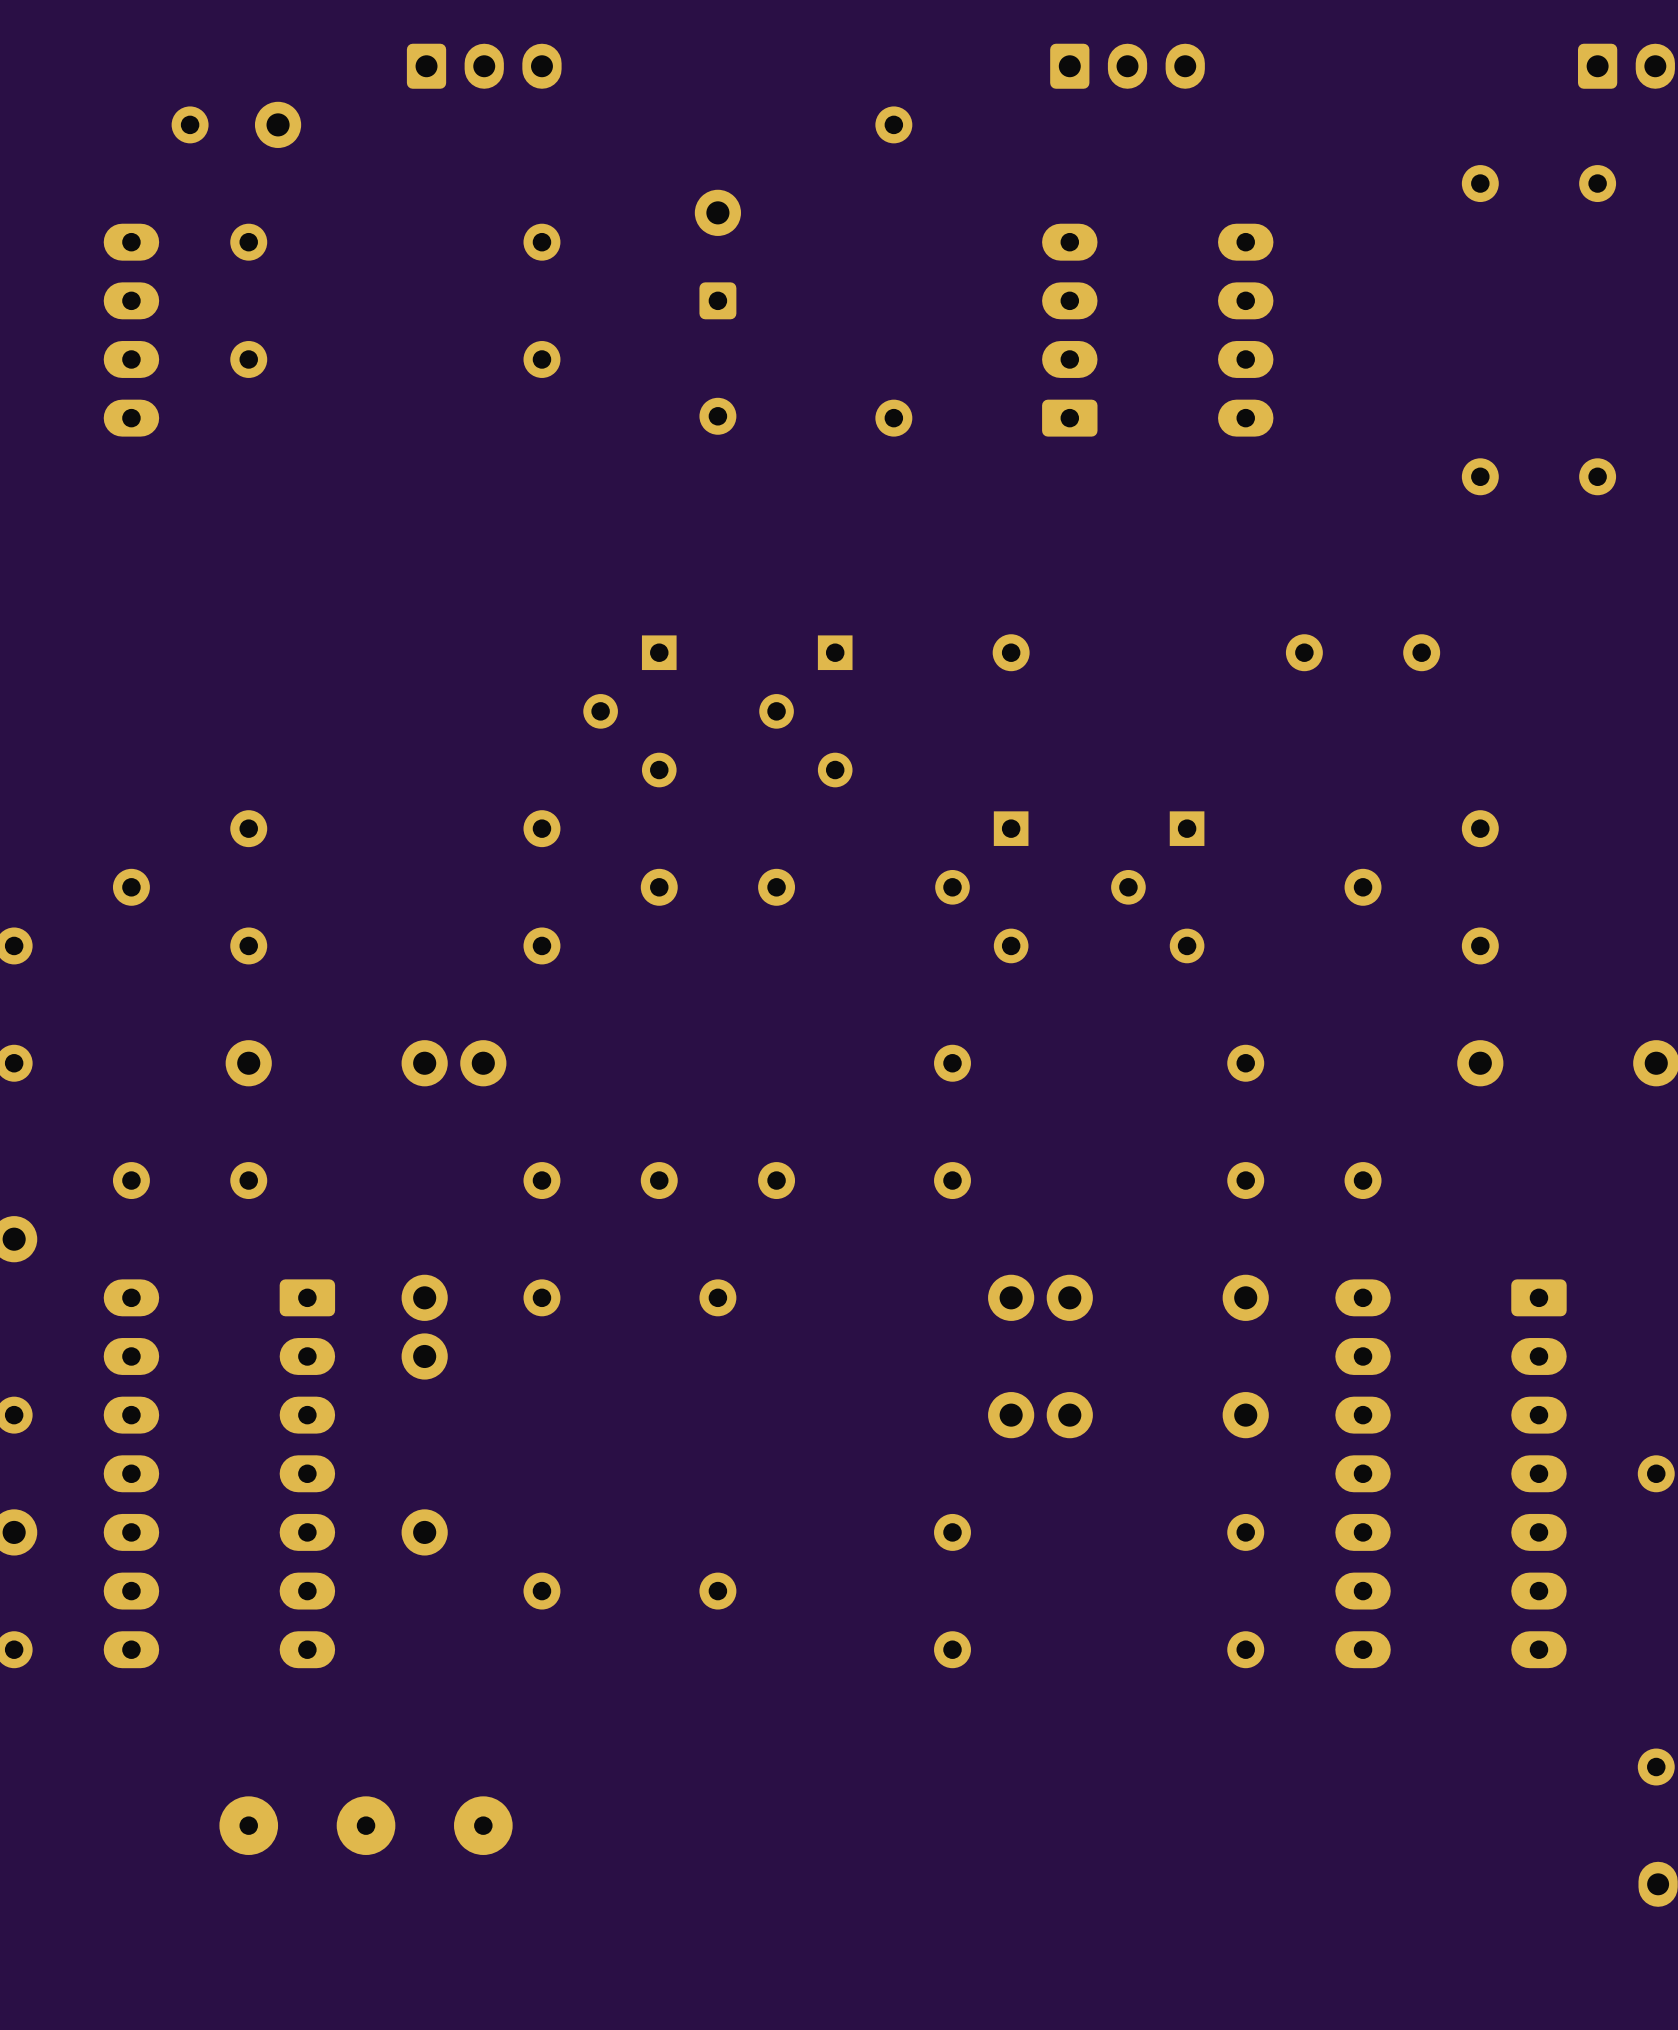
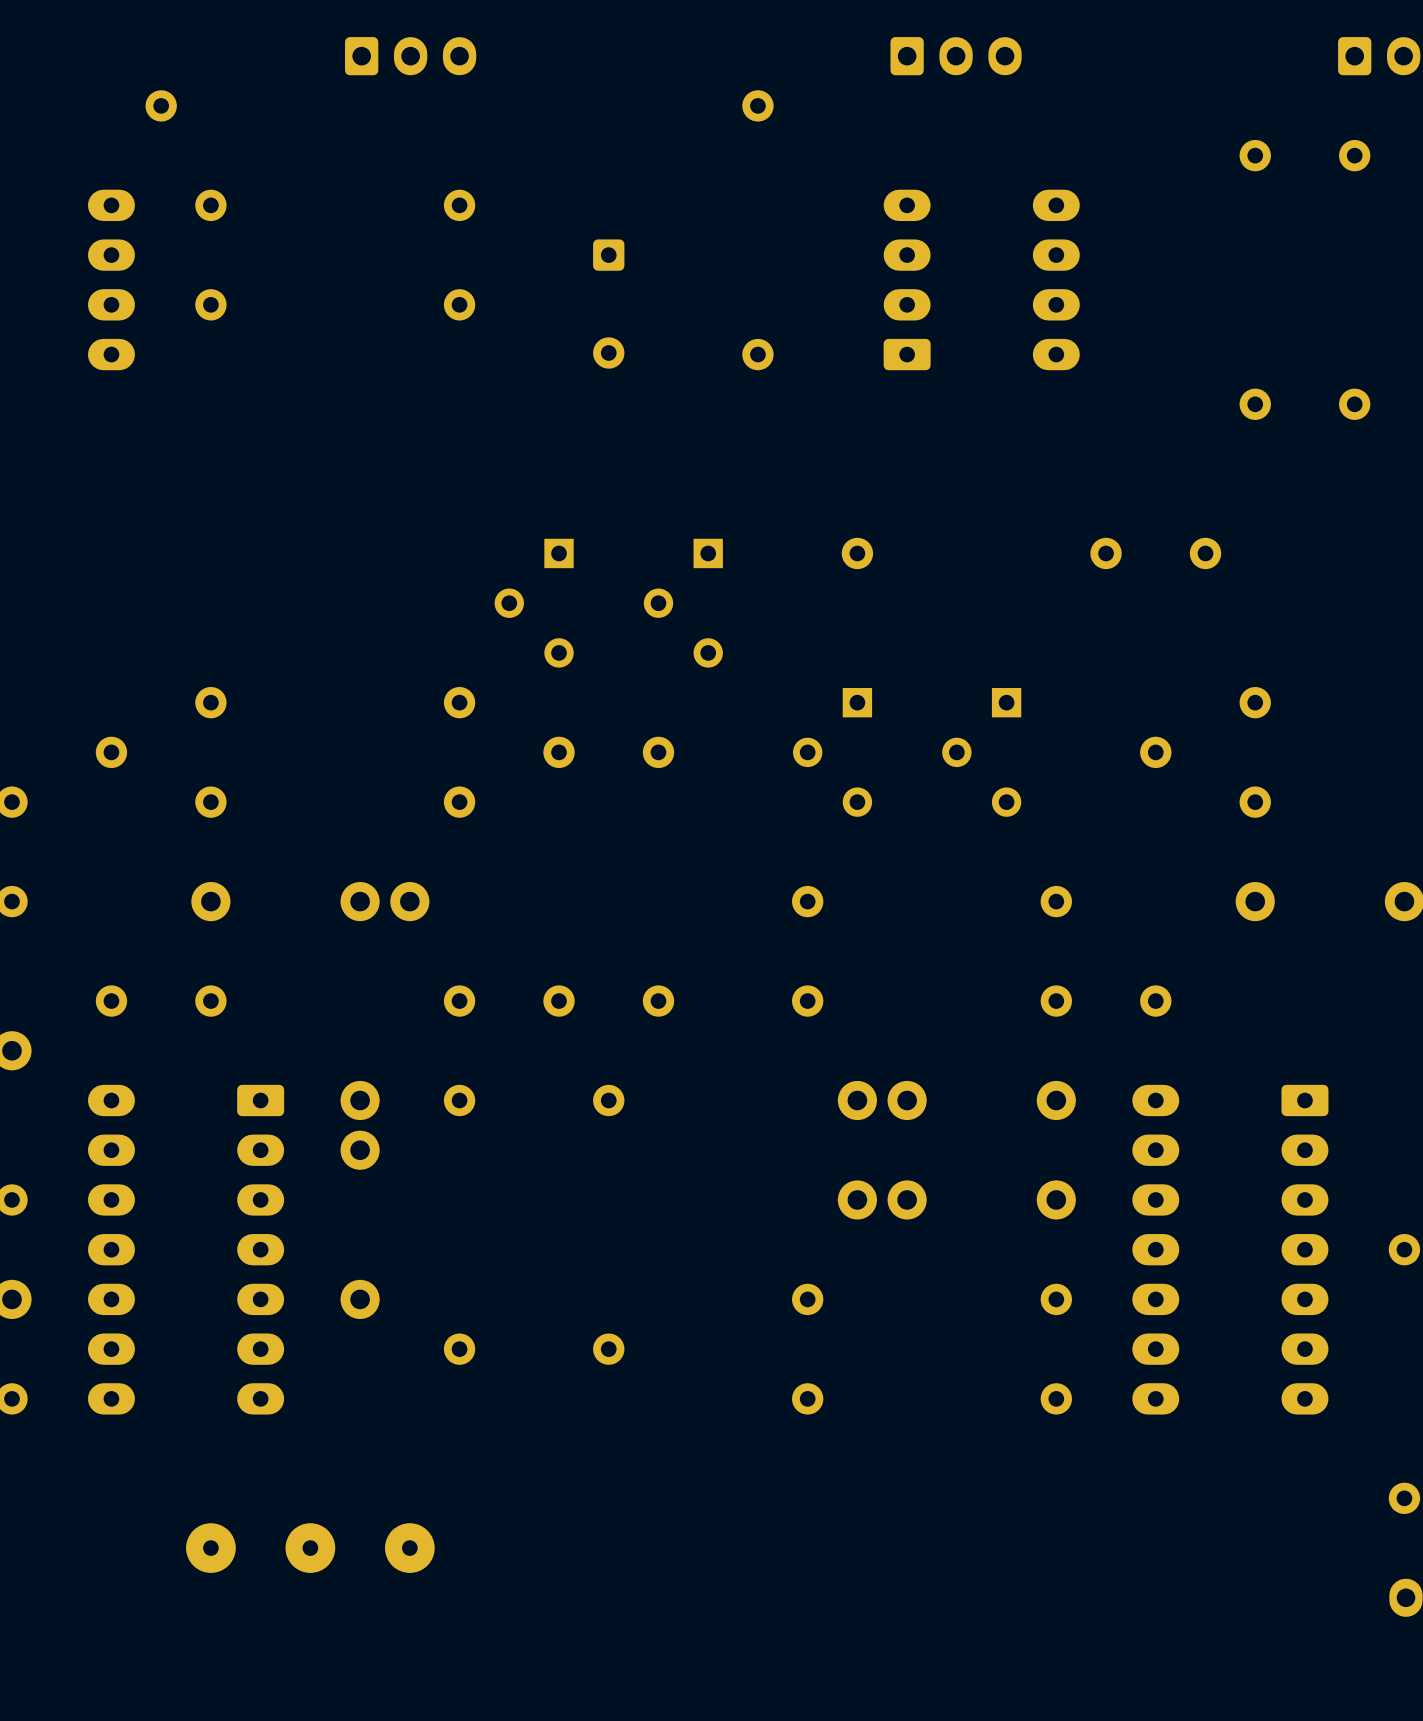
part: (278, 124) -> none
part: (717, 212) -> none

